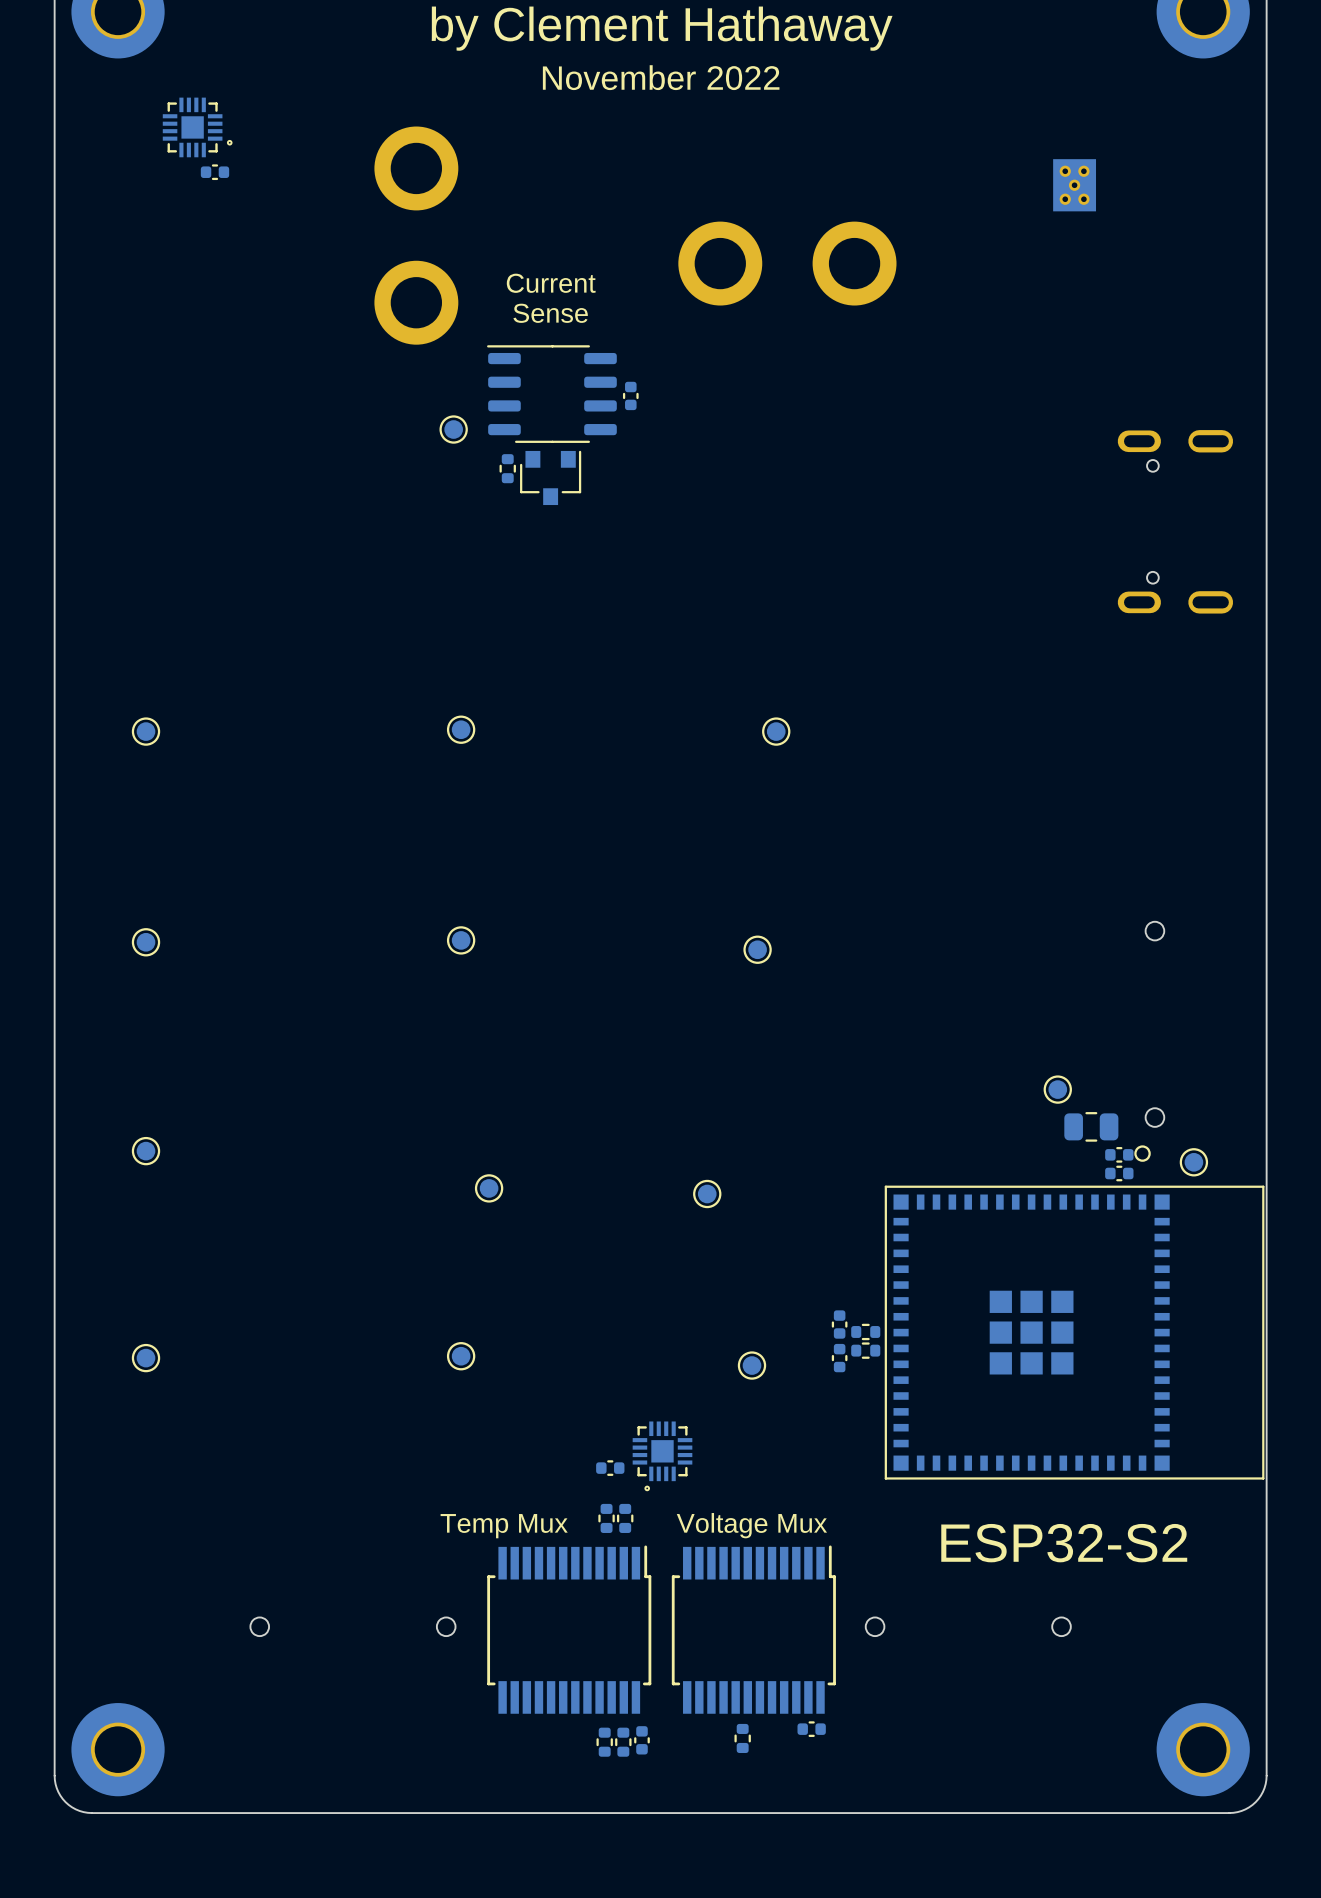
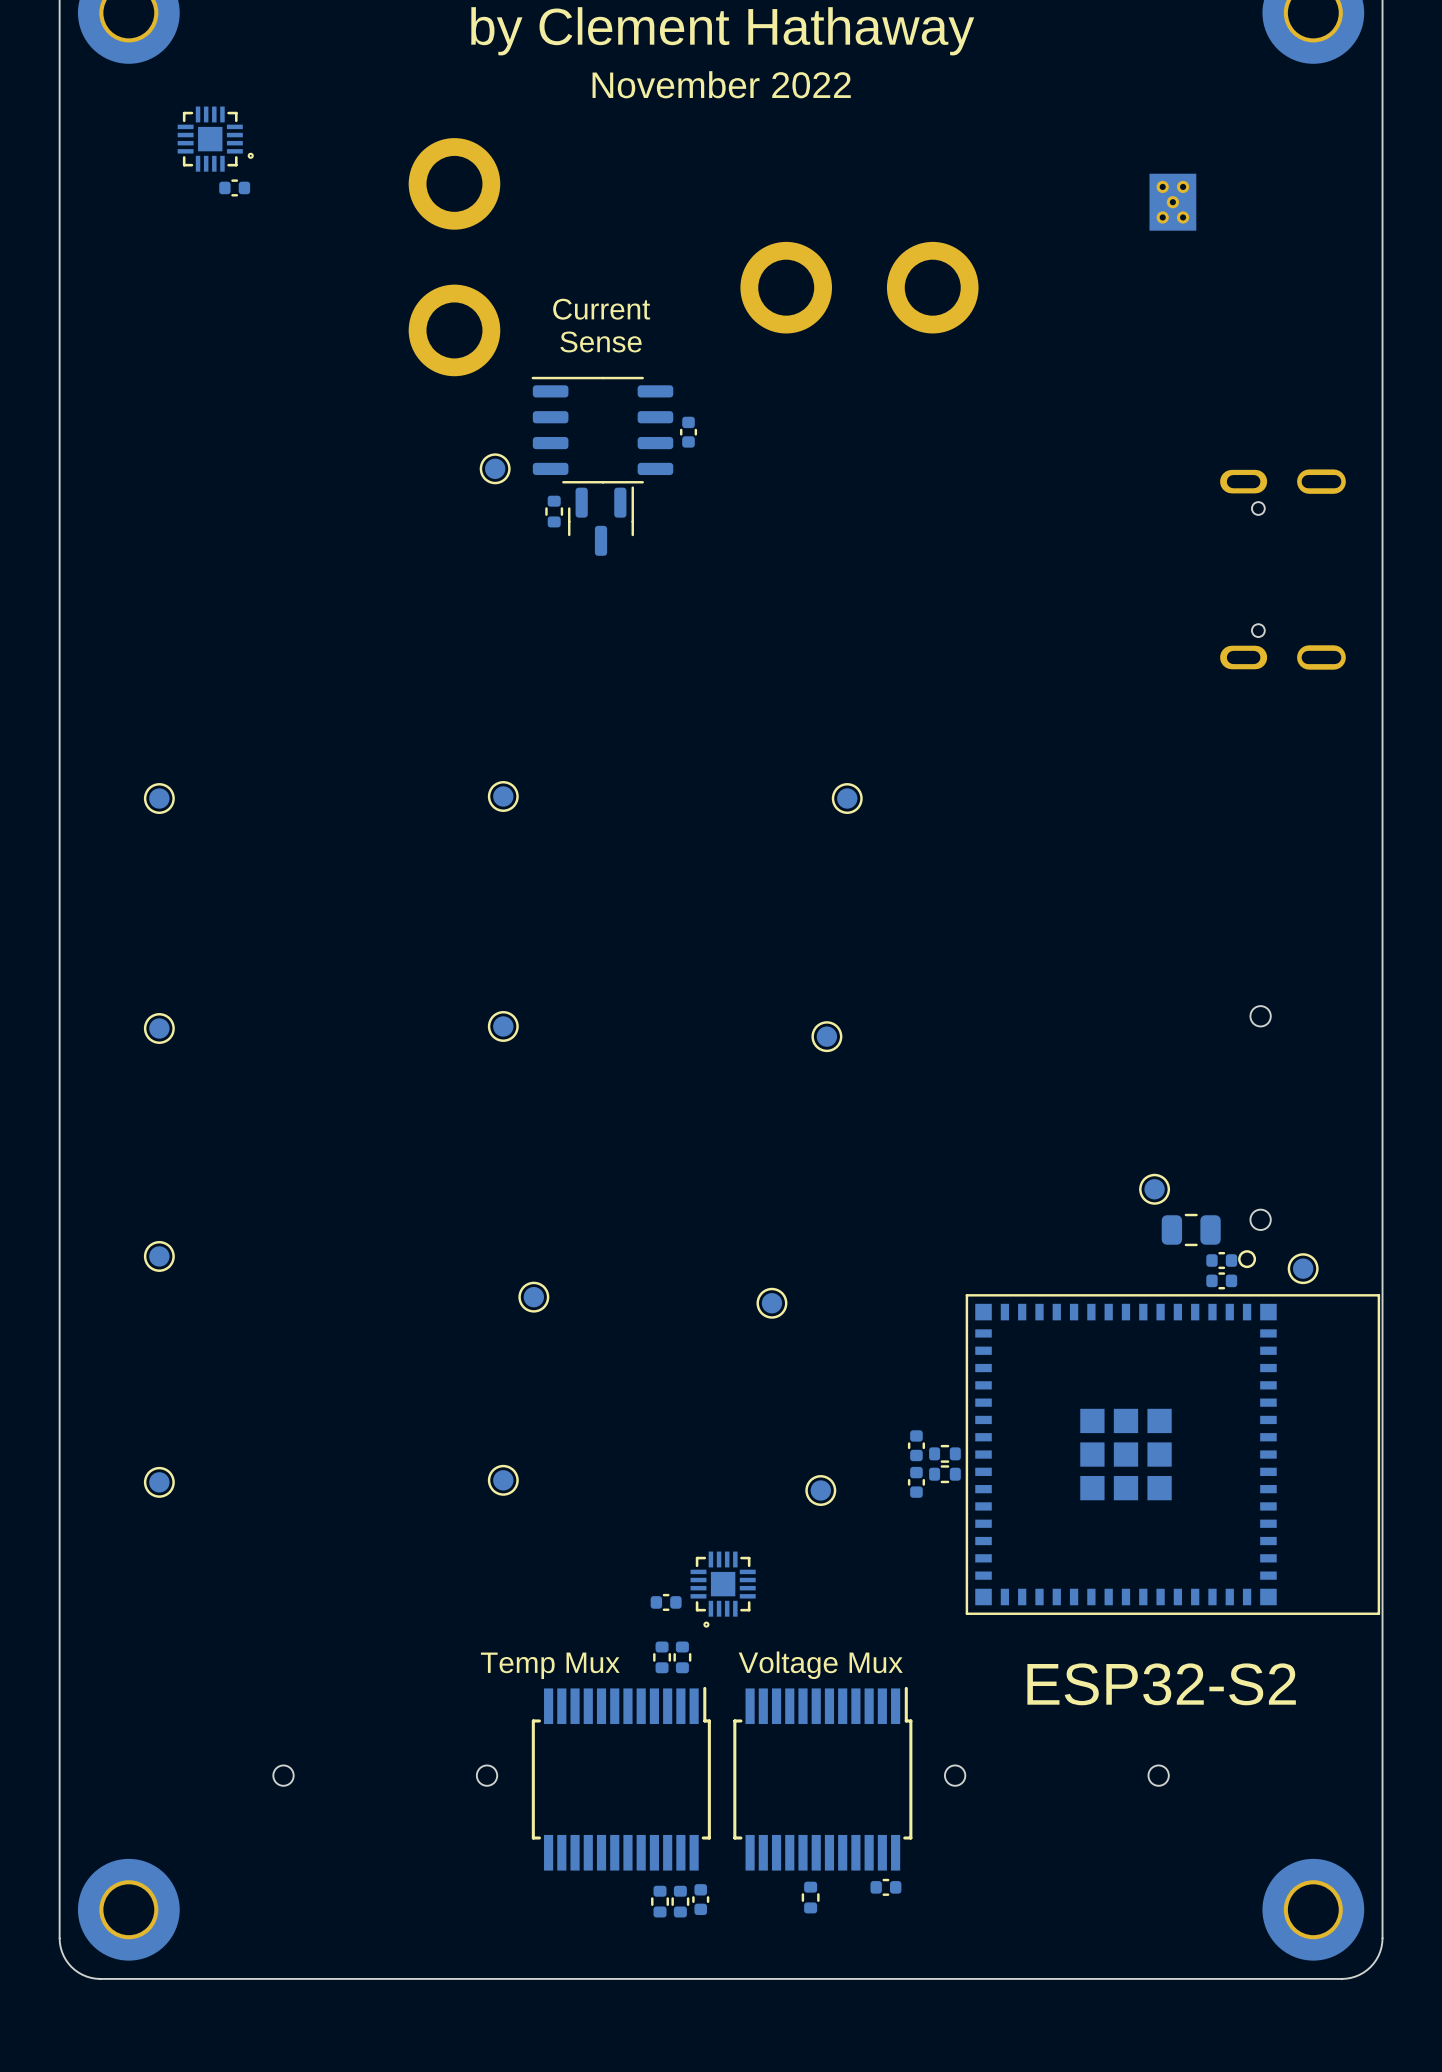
part footprint: [520, 450, 582, 506] -> [568, 486, 634, 556]

